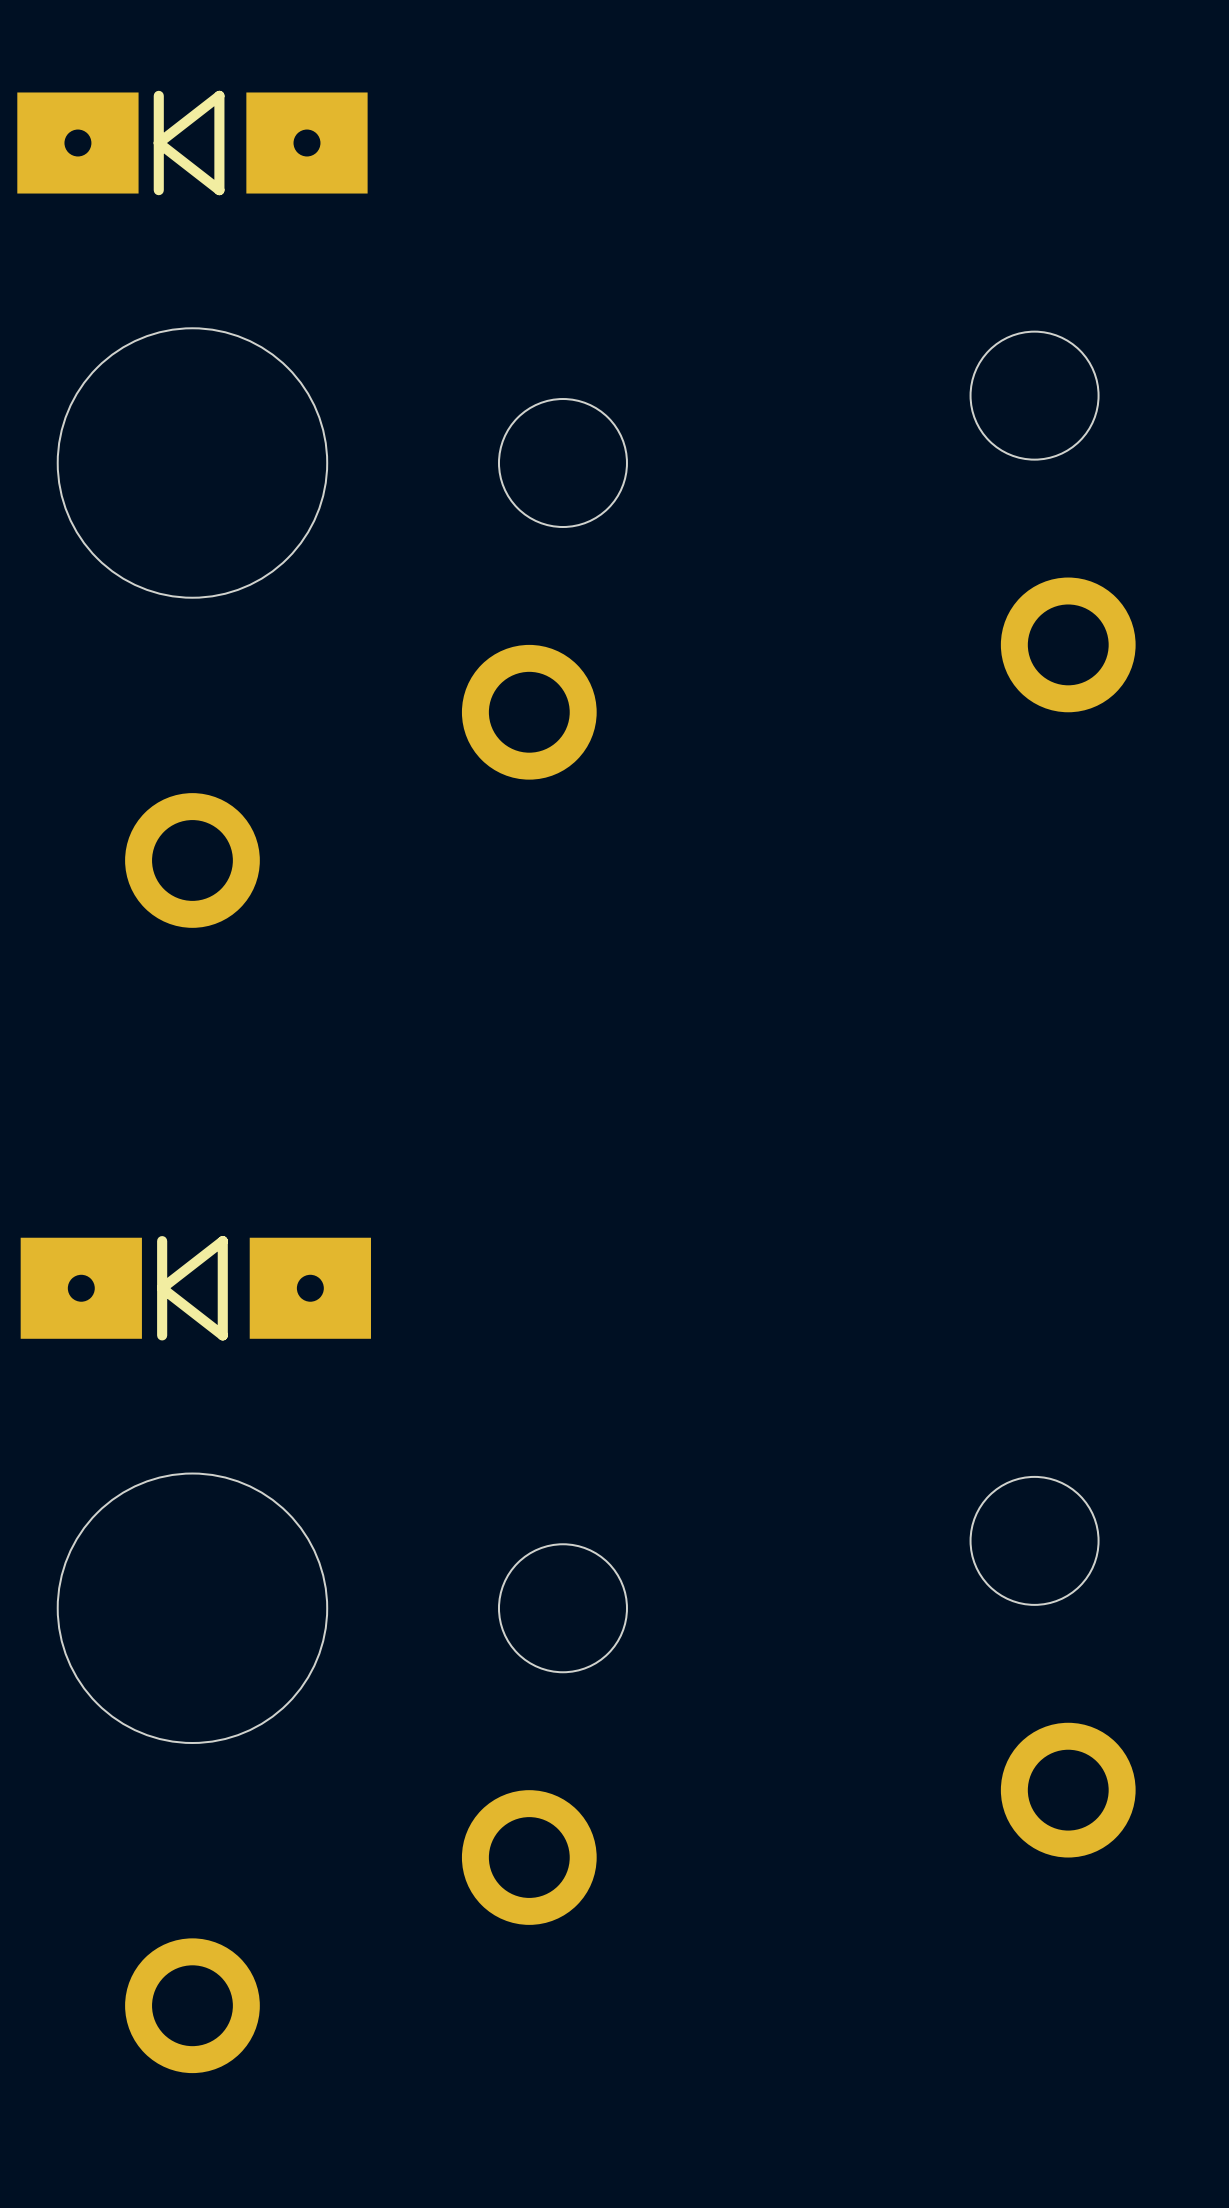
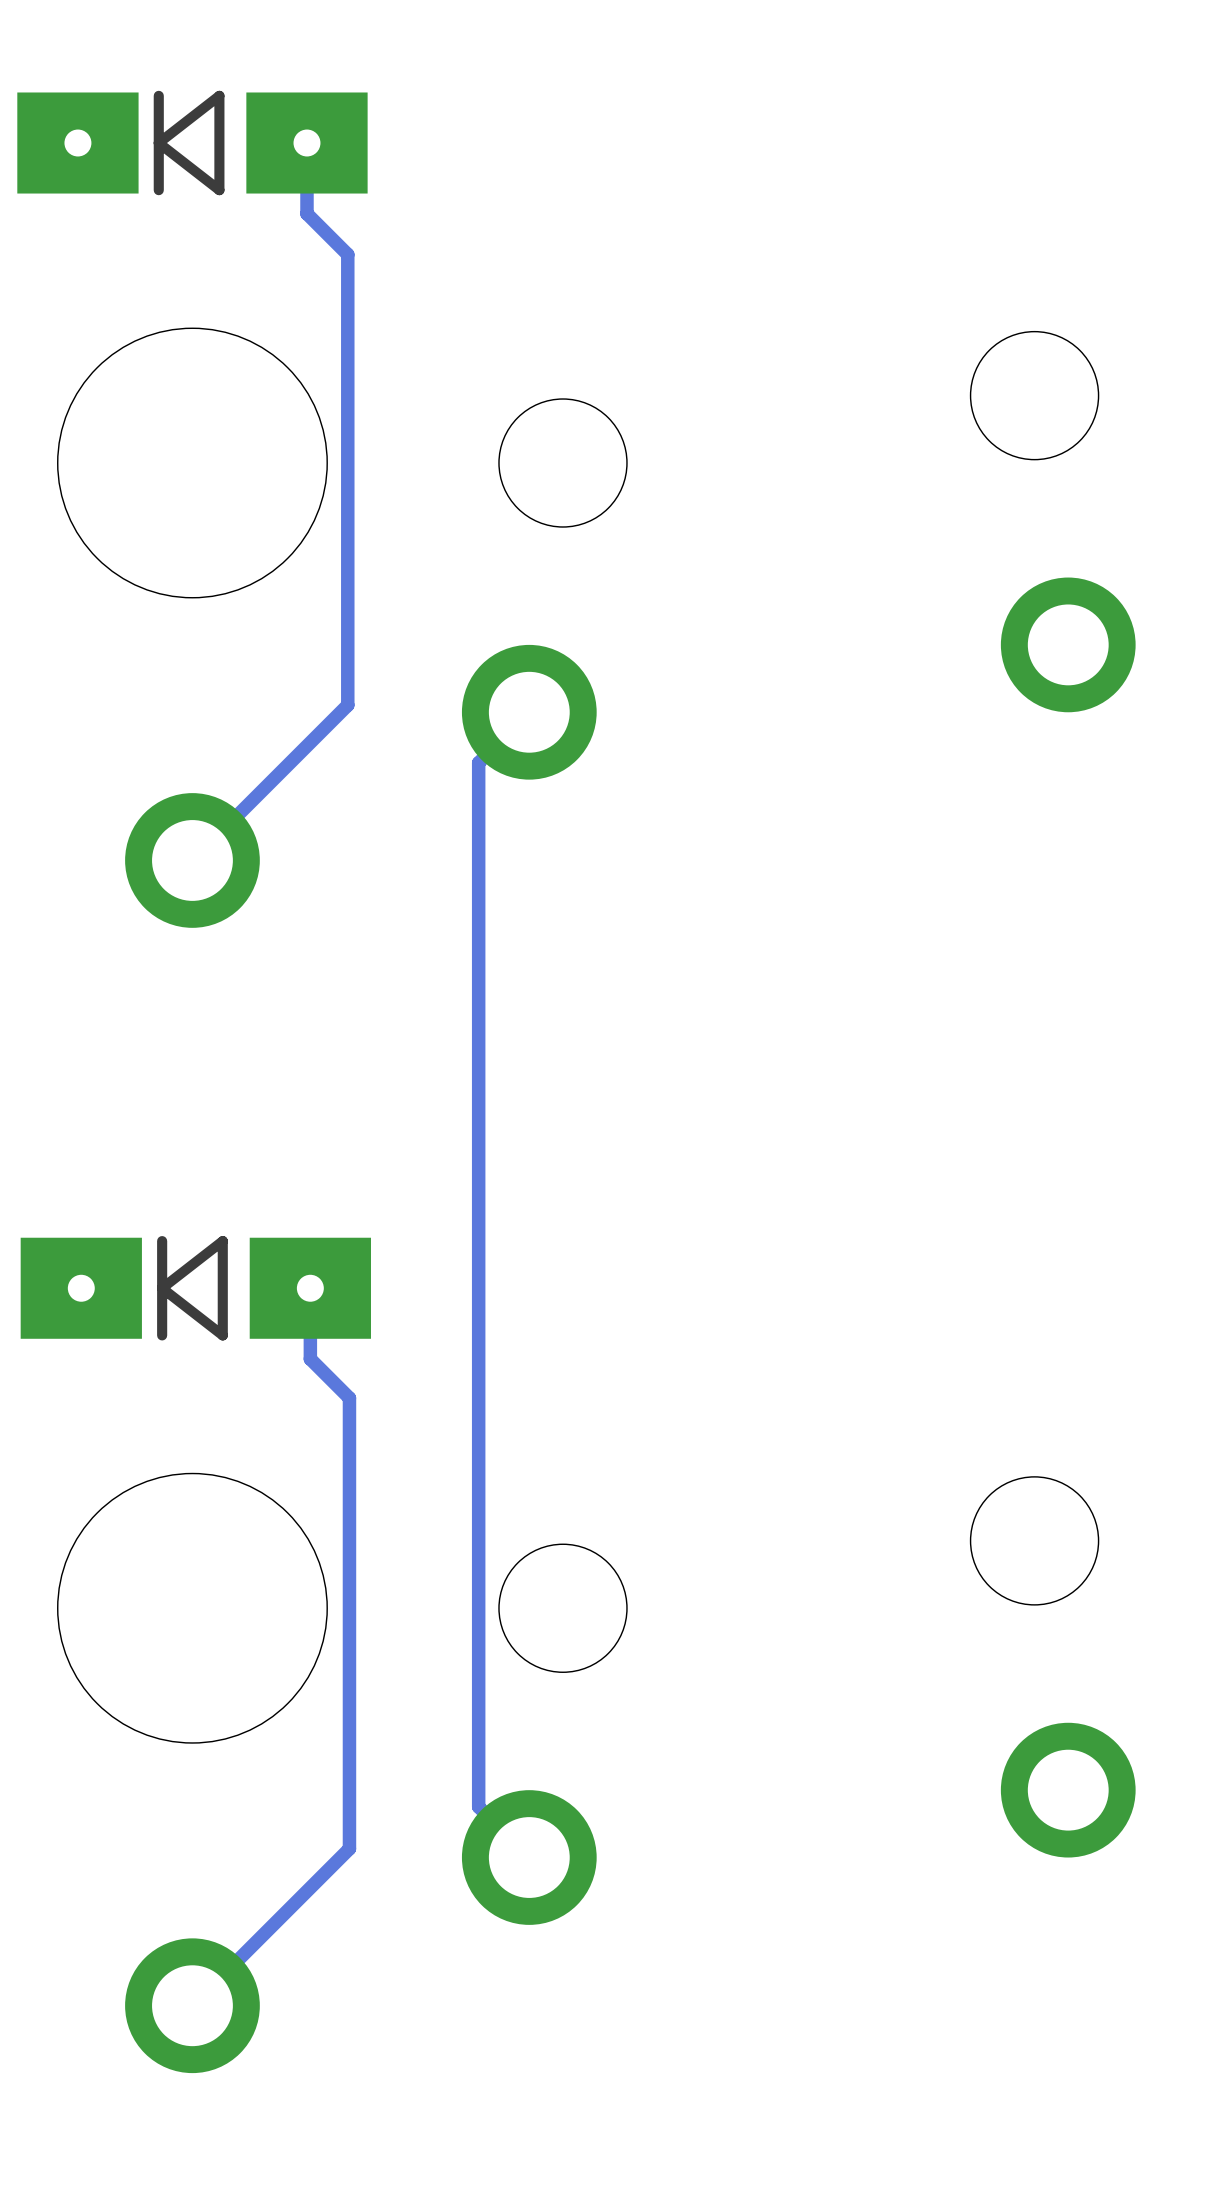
track: none -> (306, 143) (306, 213) (347, 254) (347, 705) (192, 860)
track: none -> (529, 712) (478, 762) (478, 1806) (529, 1857)
track: none -> (310, 1288) (310, 1359) (349, 1398) (349, 1848) (192, 2005)

